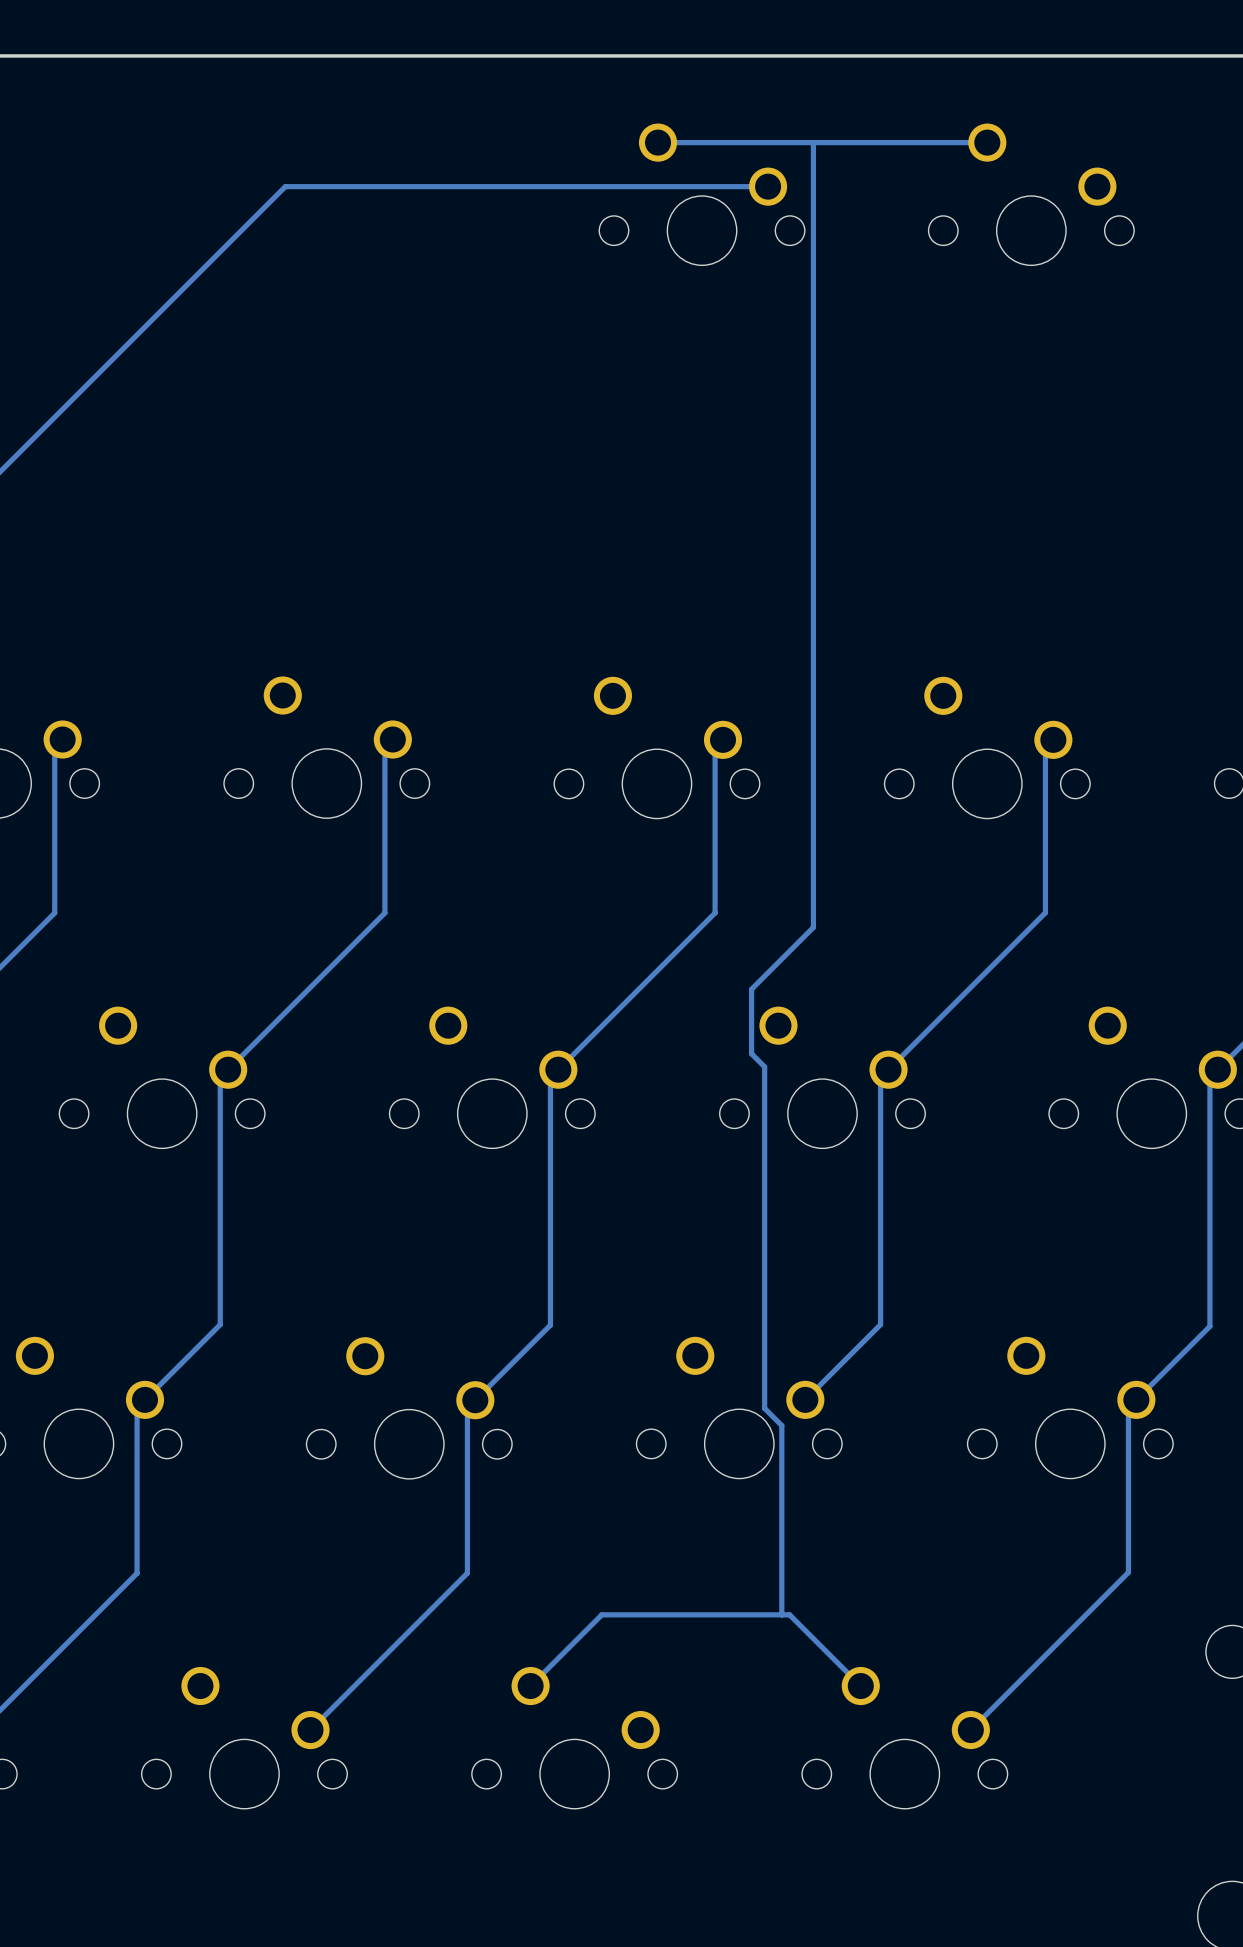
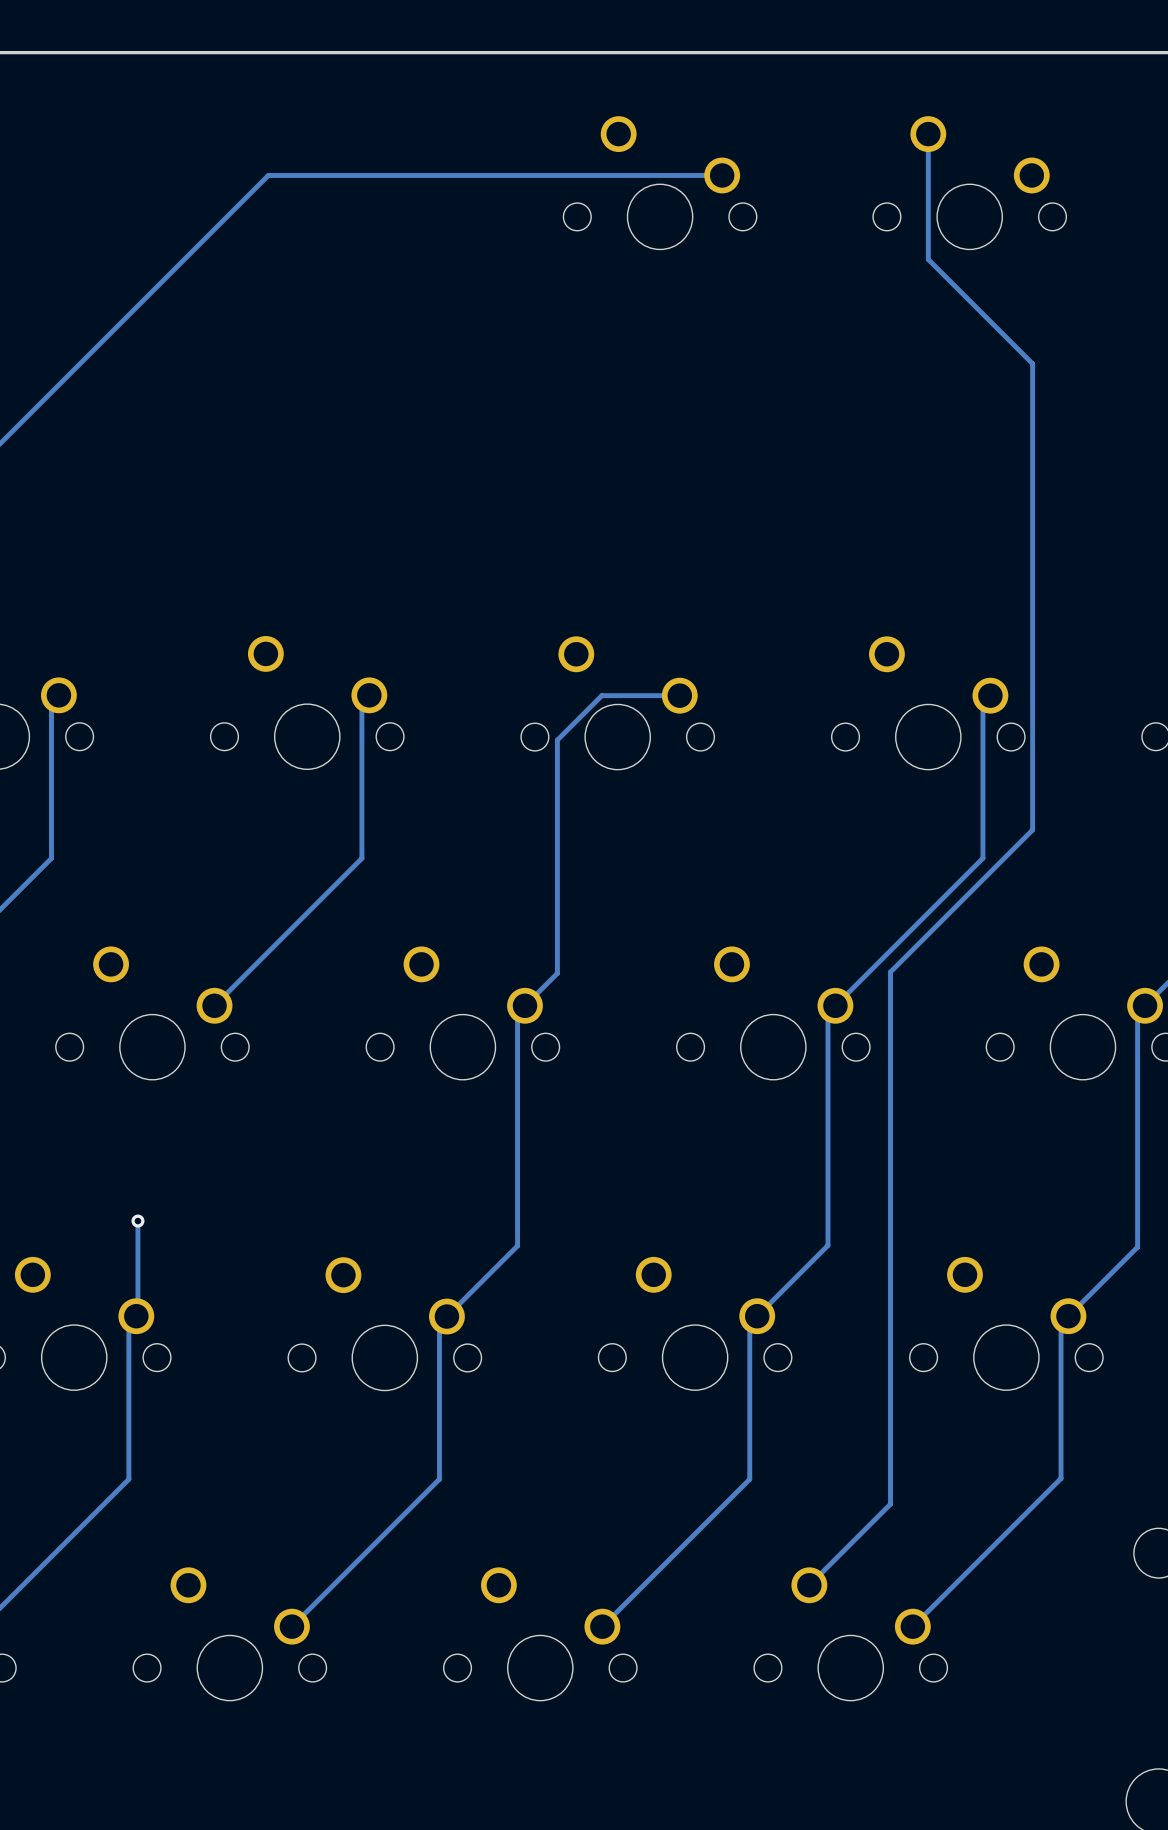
track: (813, 142) (813, 927) (751, 989) (751, 1053) (764, 1066) (764, 1408) (781, 1425) (781, 1614) -> none
track: (987, 142) (658, 142) -> (928, 134) (928, 259) (1032, 363) (1032, 829) (890, 972) (890, 1504) (809, 1585)
track: (723, 739) (715, 747) (715, 912) (592, 1035) -> (679, 695) (601, 695) (557, 740) (557, 973)
track: (228, 1069) (220, 1077) (220, 1324) (146, 1398) -> (137, 1221) (137, 1314)
via: none -> (137, 1221)
track: none -> (757, 1316) (749, 1323) (749, 1479) (602, 1626)
track: (860, 1686) (789, 1614) (601, 1614) (530, 1686) -> none

